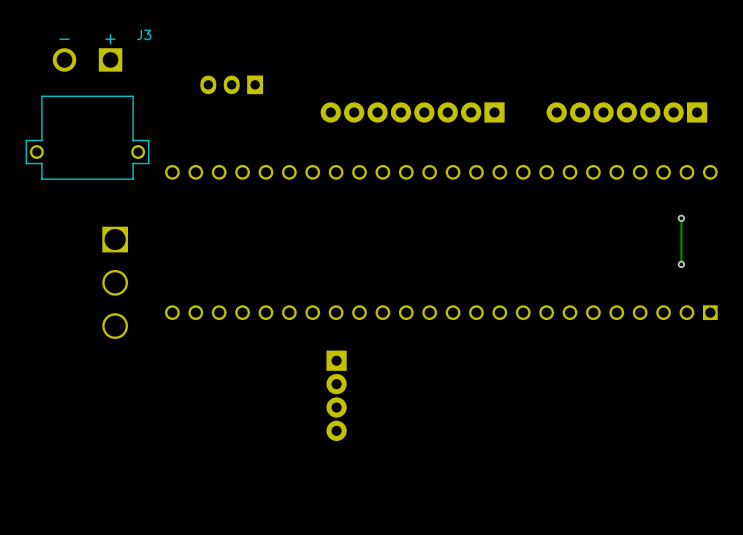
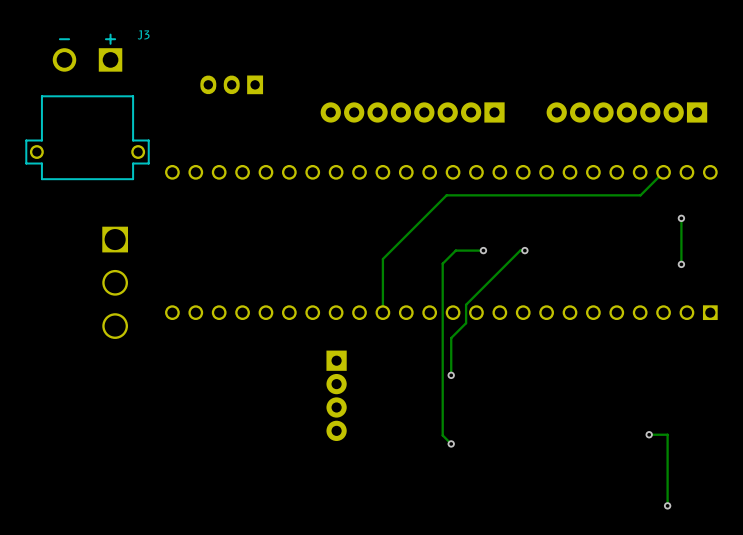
track: none -> (663, 172) (640, 195) (446, 195) (382, 259) (382, 312)
track: none -> (483, 250) (455, 250) (442, 263) (442, 435) (451, 443)
via: none -> (483, 250)
track: none -> (524, 250) (520, 250) (466, 304) (466, 323) (451, 338) (451, 375)
via: none -> (524, 250)
via: none -> (451, 375)
track: none -> (649, 434) (667, 434) (667, 505)
via: none -> (649, 434)
via: none -> (451, 443)
via: none -> (667, 505)

